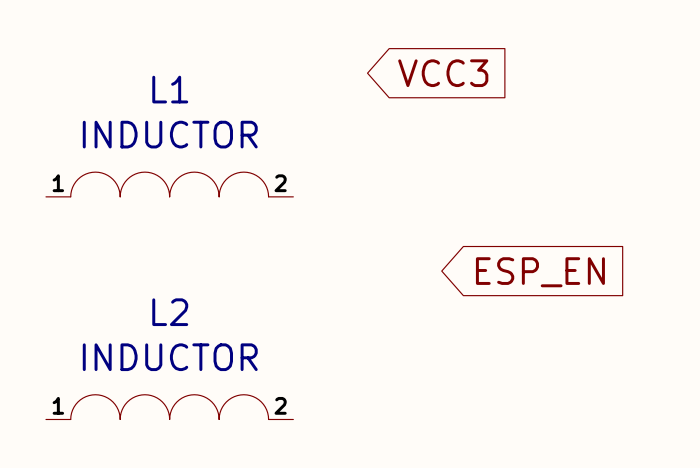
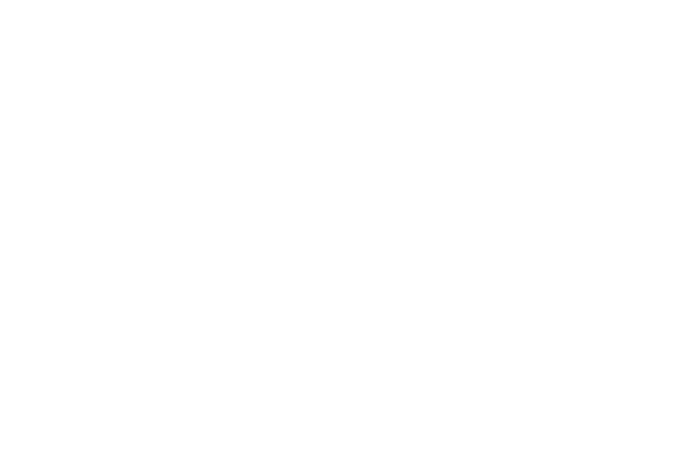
global label: VCC3 (443, 73) -> none
L1: INDUCTOR (169, 184) -> none
global label: ESP_EN (540, 272) -> none
L2: INDUCTOR (169, 407) -> none

